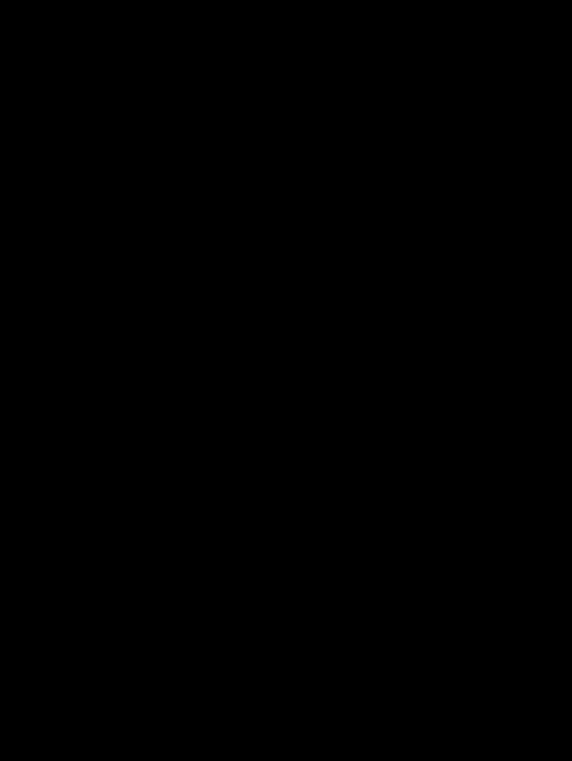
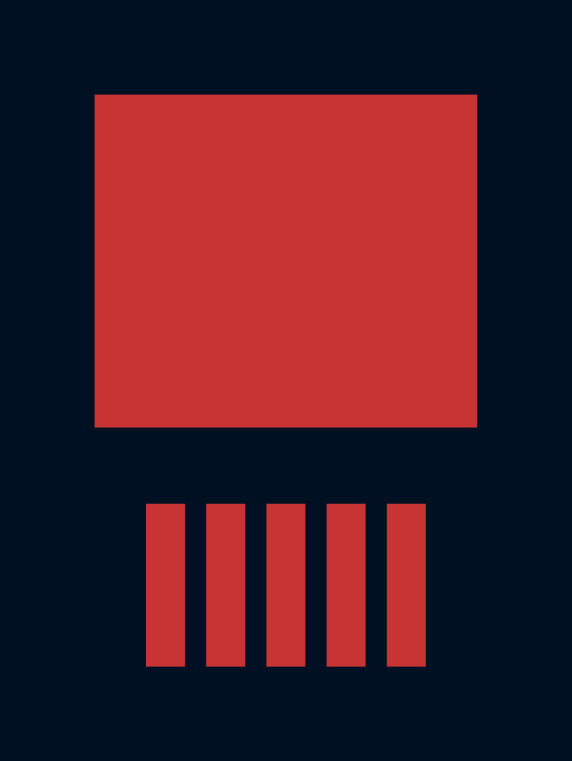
part: none -> (285, 380)

